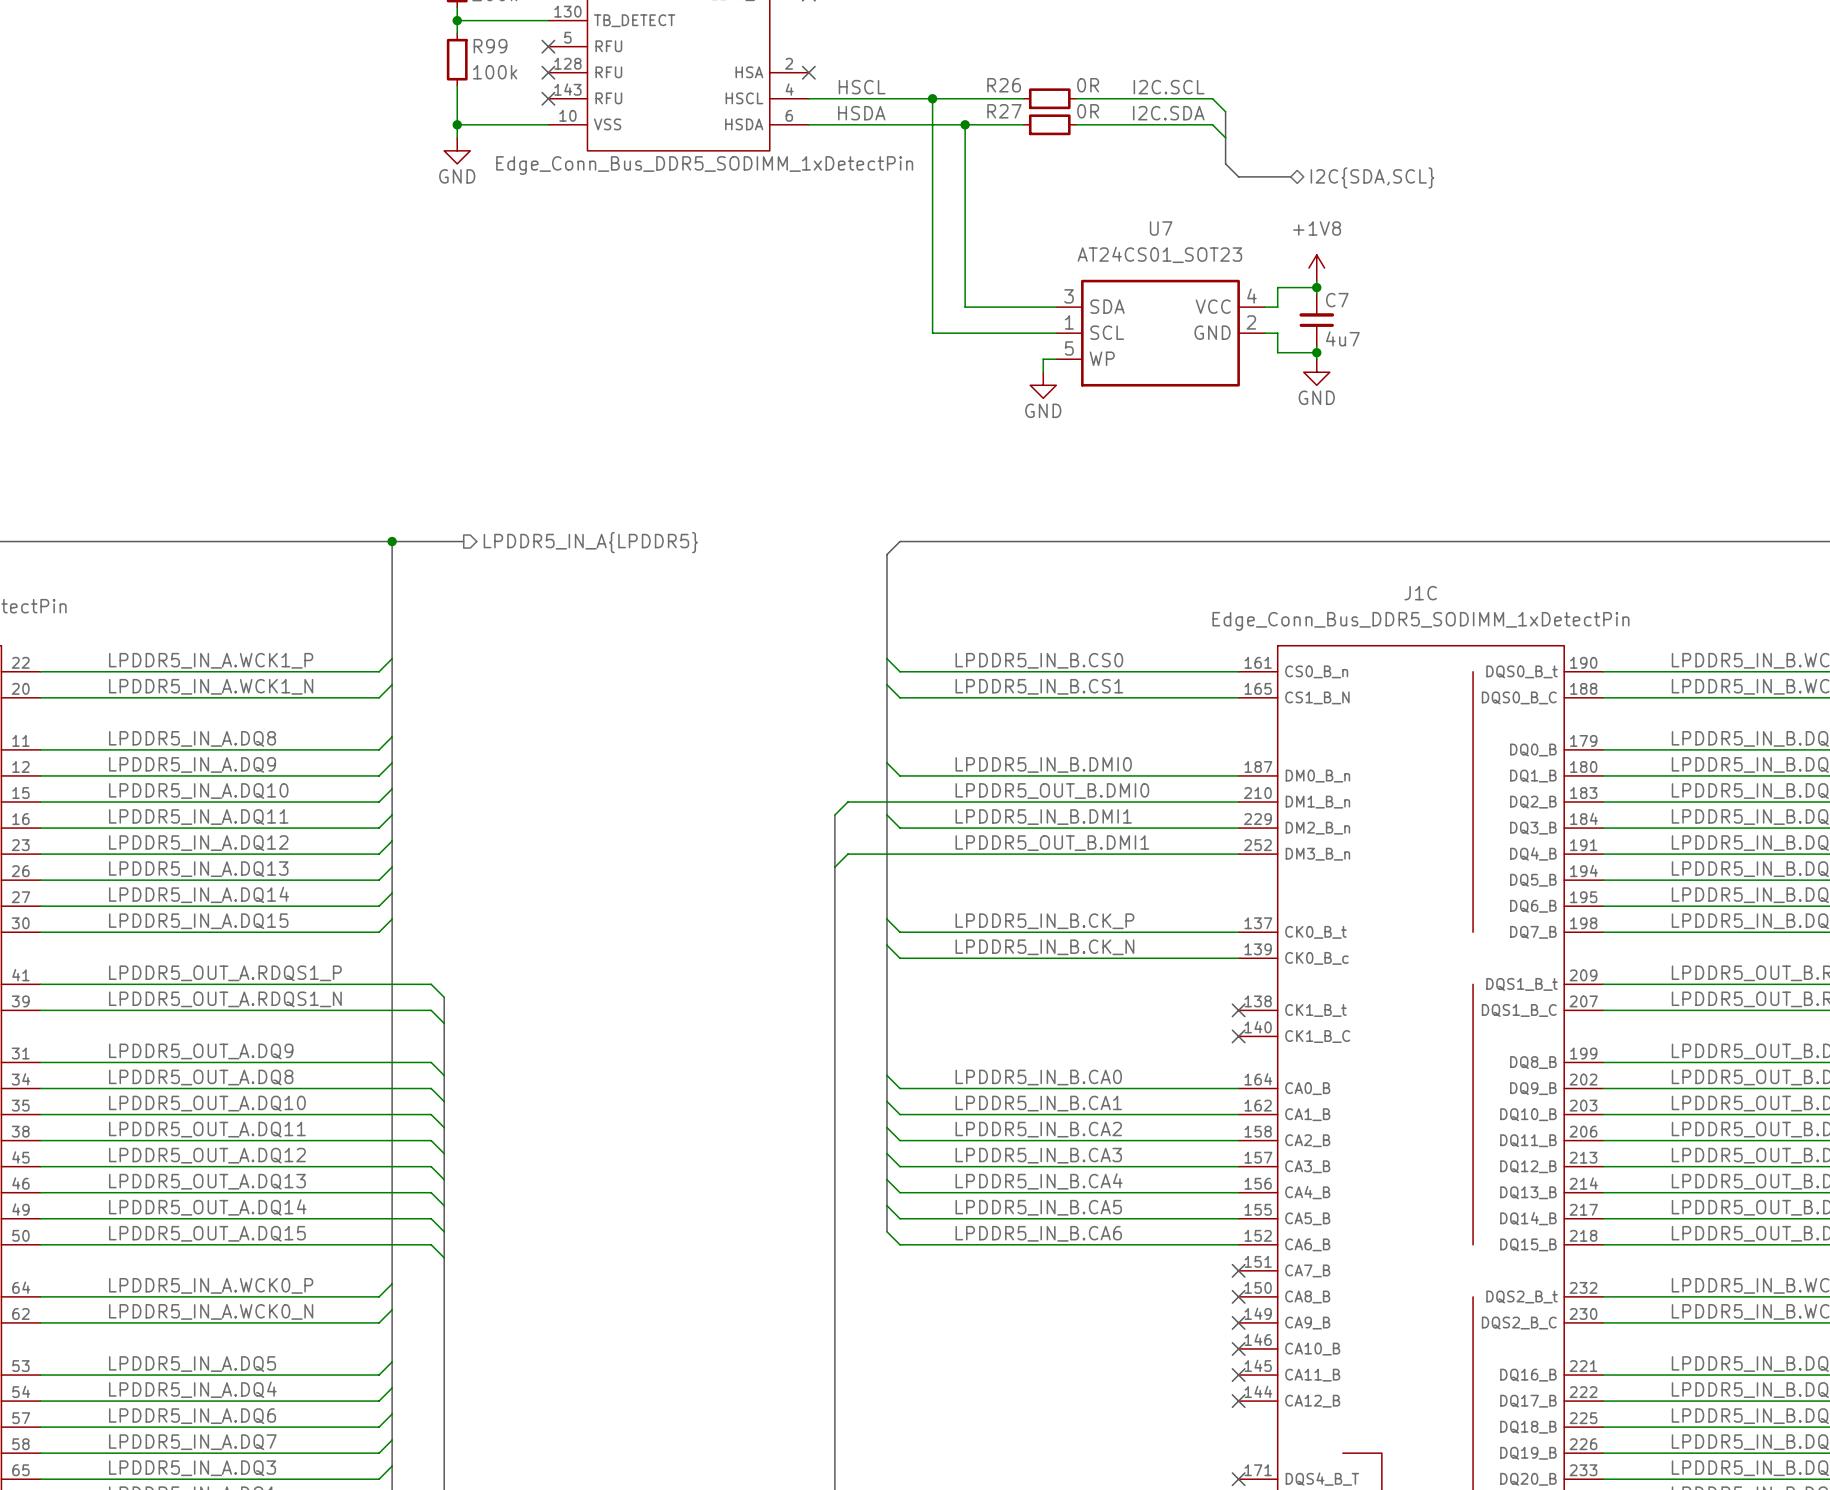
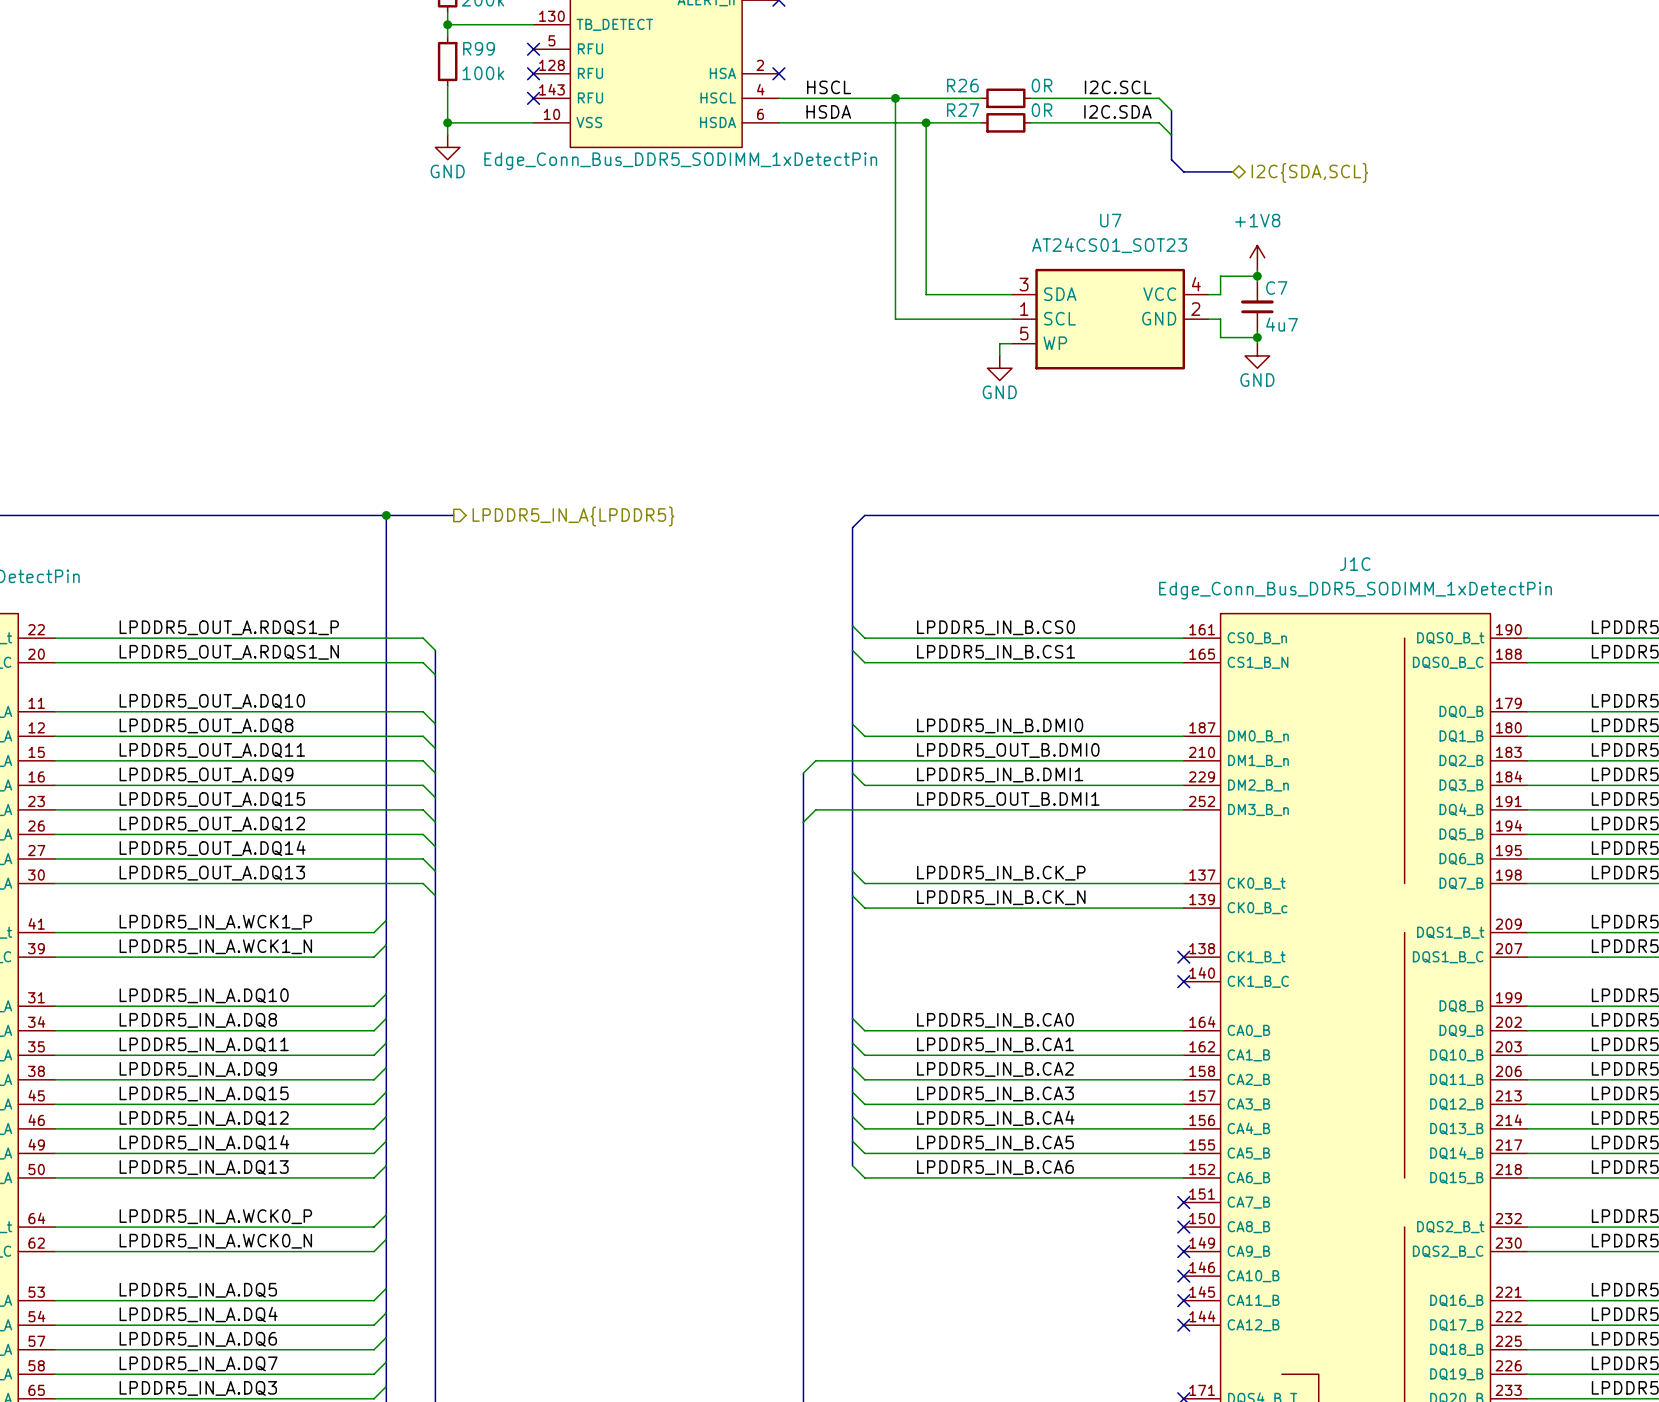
wire: (392, 658) (379, 671) -> (435, 650) (423, 638) (374, 638)
label: LPDDR5_IN_A.WCK1_P (211, 660) -> LPDDR5_OUT_A.RDQS1_P (229, 627)
wire: (392, 684) (379, 697) -> (435, 674) (423, 662) (374, 662)
bus: none -> (435, 650) (435, 944)
label: LPDDR5_IN_A.WCK1_N (211, 686) -> LPDDR5_OUT_A.RDQS1_N (229, 652)
wire: (392, 736) (379, 749) -> (435, 724) (423, 711) (374, 711)
label: LPDDR5_IN_A.DQ8 (192, 738) -> LPDDR5_OUT_A.DQ10 (212, 701)
wire: (392, 762) (379, 775) -> (435, 748) (423, 736) (374, 736)
label: LPDDR5_IN_A.DQ9 (192, 764) -> LPDDR5_OUT_A.DQ8 (206, 725)
wire: (392, 788) (379, 802) -> (435, 773) (423, 760) (374, 760)
label: LPDDR5_IN_A.DQ10 (198, 791) -> LPDDR5_OUT_A.DQ11 (212, 750)
wire: (392, 815) (379, 828) -> (435, 797) (423, 785) (374, 785)
label: LPDDR5_IN_A.DQ11 (198, 817) -> LPDDR5_OUT_A.DQ9 (206, 775)
wire: (392, 841) (379, 854) -> (435, 822) (423, 809) (374, 809)
label: LPDDR5_IN_A.DQ12 (198, 843) -> LPDDR5_OUT_A.DQ15 (212, 799)
wire: (392, 867) (379, 880) -> (435, 846) (423, 834) (374, 834)
label: LPDDR5_IN_A.DQ13 (198, 869) -> LPDDR5_OUT_A.DQ12 (212, 824)
wire: (392, 893) (379, 906) -> (435, 871) (423, 858) (374, 858)
label: LPDDR5_IN_A.DQ14 (199, 894) -> LPDDR5_OUT_A.DQ14 (212, 848)
wire: (392, 919) (379, 932) -> (435, 895) (423, 883) (374, 883)
label: LPDDR5_IN_A.DQ15 (198, 921) -> LPDDR5_OUT_A.DQ13 (212, 873)
label: LPDDR5_OUT_A.RDQS1_P (225, 973) -> LPDDR5_IN_A.WCK1_P (215, 922)
wire: (379, 984) (431, 984) (444, 997) -> (374, 932) (386, 920)
label: LPDDR5_OUT_A.RDQS1_N (225, 999) -> LPDDR5_IN_A.WCK1_N (215, 946)
wire: (379, 1010) (431, 1010) (444, 1023) -> (374, 957) (386, 944)
label: LPDDR5_OUT_A.DQ9 (201, 1051) -> LPDDR5_IN_A.DQ10 (204, 995)
wire: (379, 1062) (431, 1062) (444, 1075) -> (374, 1006) (386, 993)
label: LPDDR5_OUT_A.DQ8 (201, 1077) -> LPDDR5_IN_A.DQ8 (198, 1020)
wire: (379, 1088) (431, 1088) (444, 1101) -> (374, 1030) (386, 1018)
label: LPDDR5_OUT_A.DQ10 (207, 1103) -> LPDDR5_IN_A.DQ11 (204, 1044)
wire: (379, 1114) (431, 1114) (444, 1127) -> (374, 1055) (386, 1043)
label: LPDDR5_OUT_A.DQ11 (207, 1129) -> LPDDR5_IN_A.DQ9 (198, 1069)
wire: (379, 1140) (431, 1140) (444, 1153) -> (374, 1079) (386, 1067)
label: LPDDR5_OUT_A.DQ12 (207, 1155) -> LPDDR5_IN_A.DQ15 (204, 1093)
wire: (379, 1166) (431, 1166) (444, 1179) -> (374, 1104) (386, 1092)
label: LPDDR5_OUT_A.DQ13 (207, 1181) -> LPDDR5_IN_A.DQ12 (204, 1118)
wire: (379, 1192) (431, 1192) (444, 1205) -> (374, 1128) (386, 1116)
label: LPDDR5_OUT_A.DQ14 (207, 1207) -> LPDDR5_IN_A.DQ14 (204, 1142)
wire: (379, 1218) (431, 1218) (444, 1231) -> (374, 1153) (386, 1141)
label: LPDDR5_OUT_A.DQ15 (207, 1233) -> LPDDR5_IN_A.DQ13 (204, 1167)
wire: (379, 1244) (431, 1244) (444, 1257) -> (374, 1177) (386, 1165)

